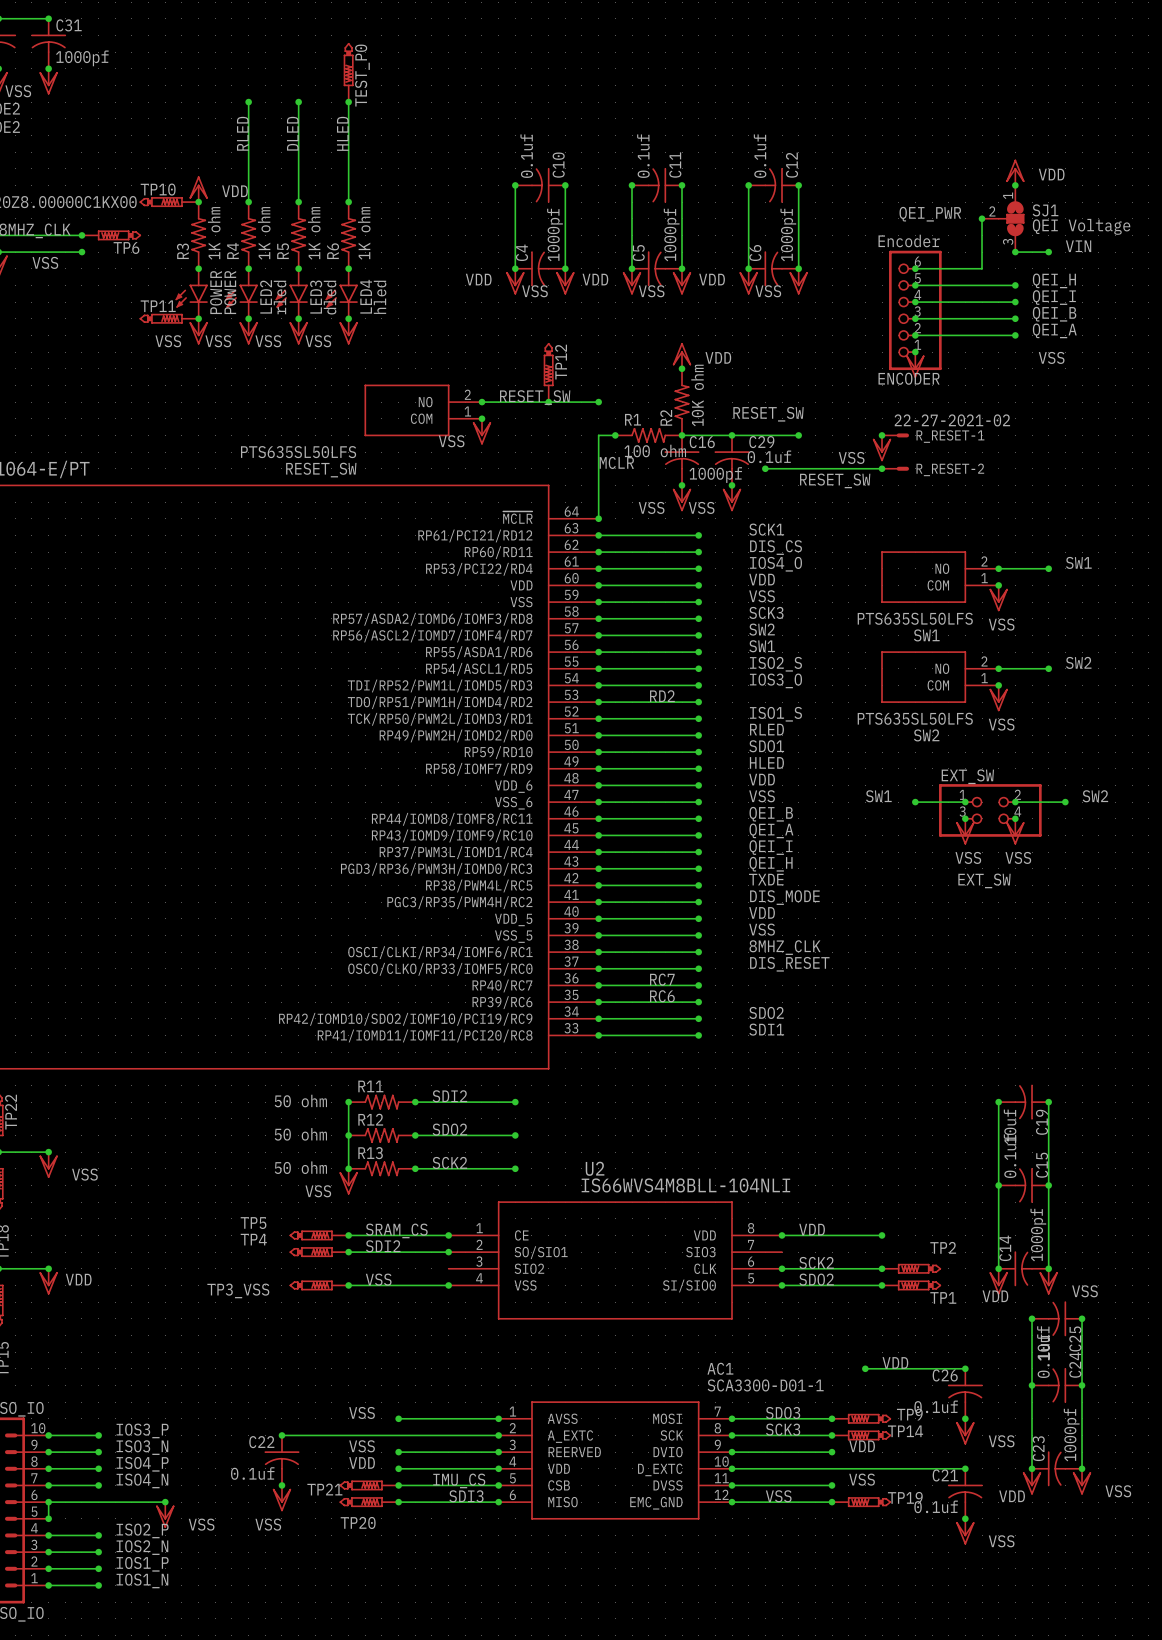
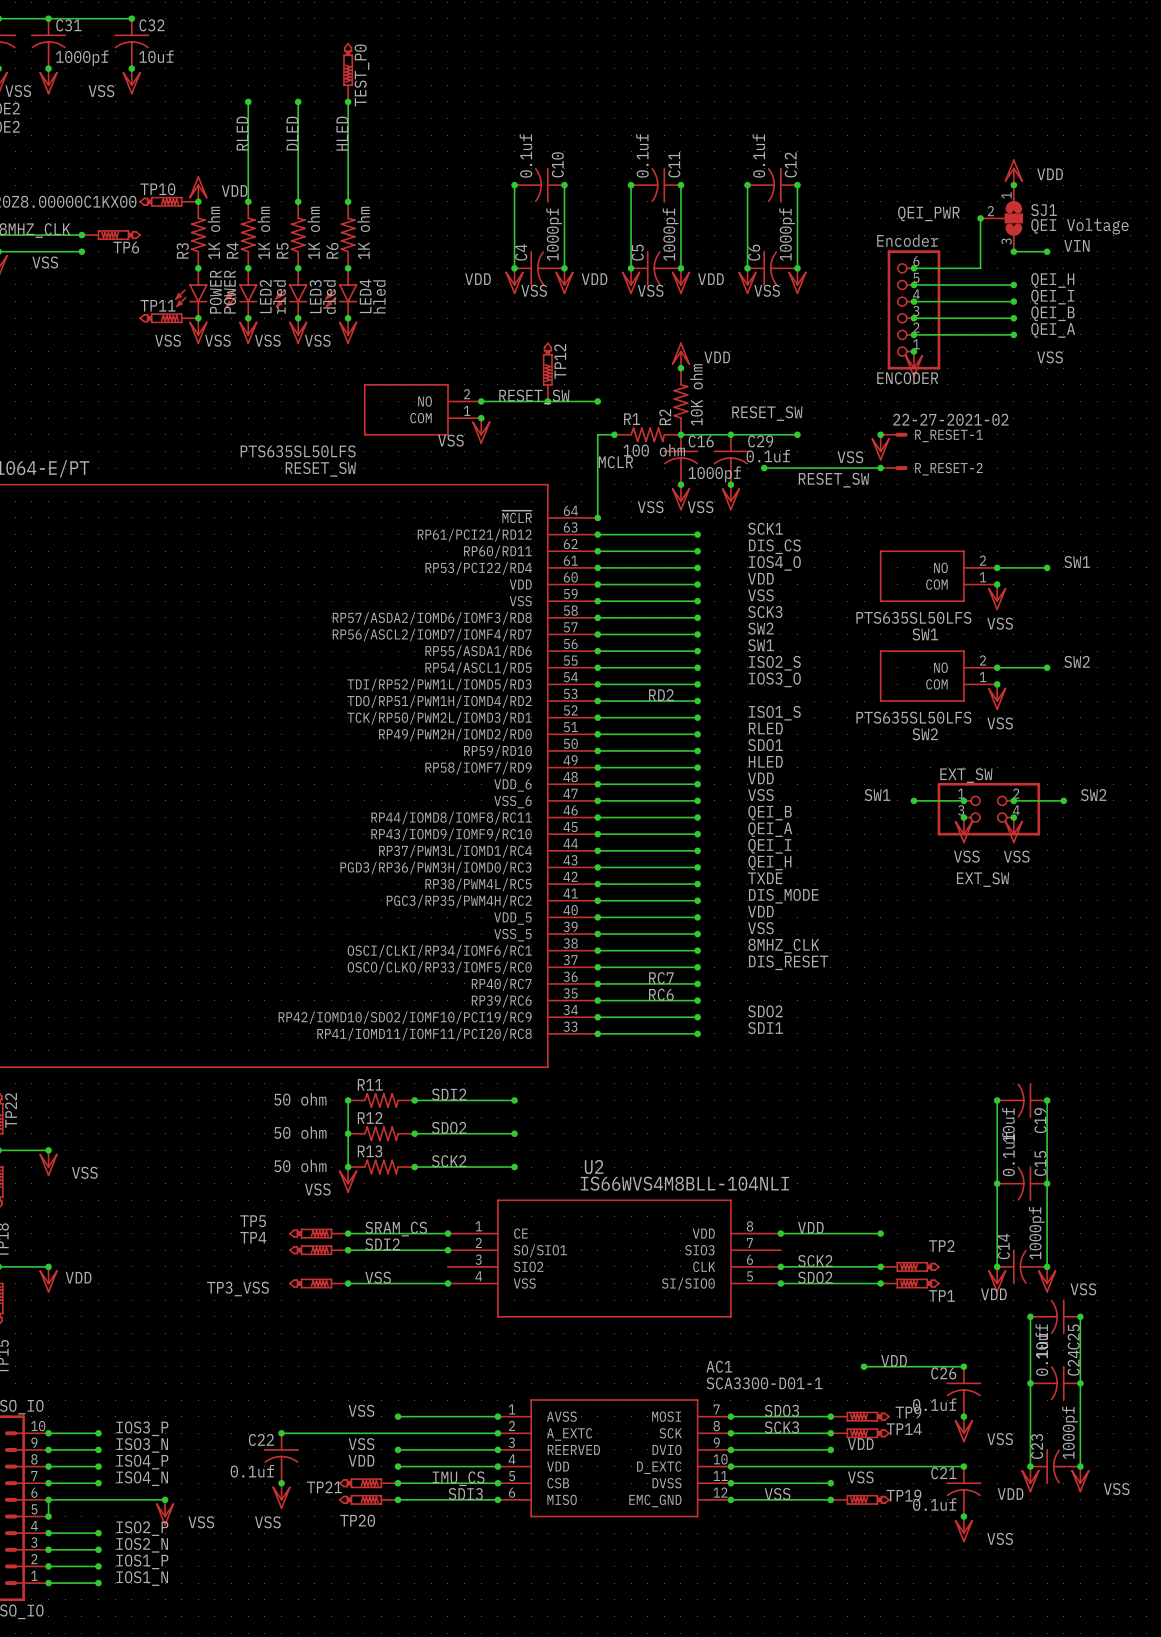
wire: none -> (48, 18) (131, 18)
junction: none -> (131, 18)
C32: none -> 10uf (131, 43)
junction: none -> (131, 68)
power symbol: none -> VSS (131, 81)

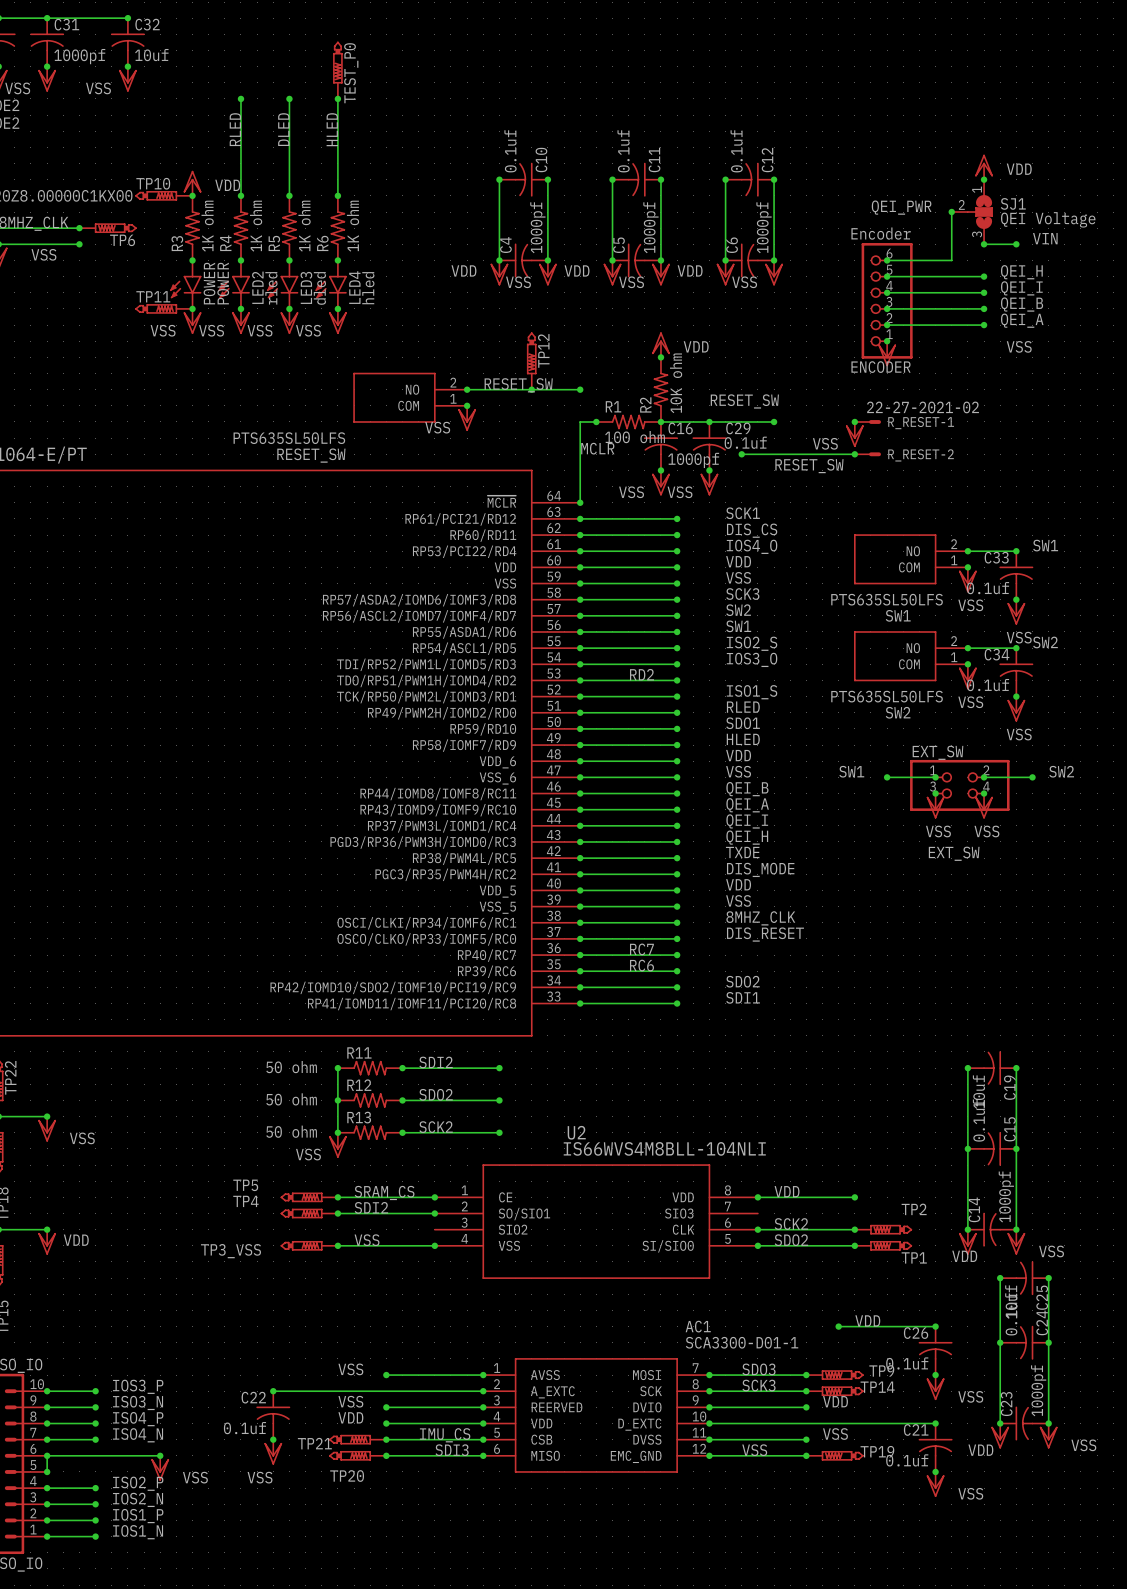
C33: none -> 0.1uf (1016, 575)
junction: none -> (1016, 599)
power symbol: none -> VSS (1016, 612)
C34: none -> 0.1uf (1016, 672)
junction: none -> (1016, 696)
power symbol: none -> VSS (1016, 709)

